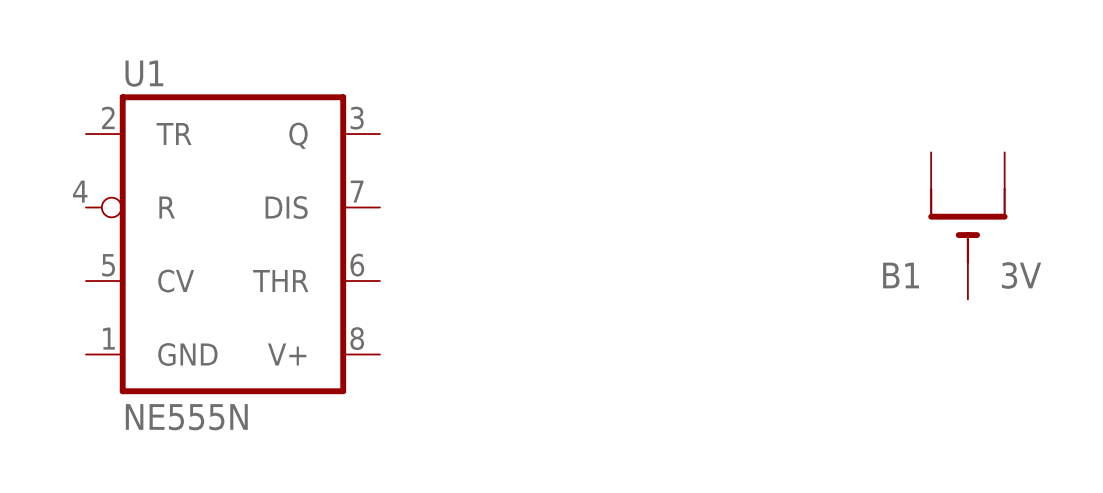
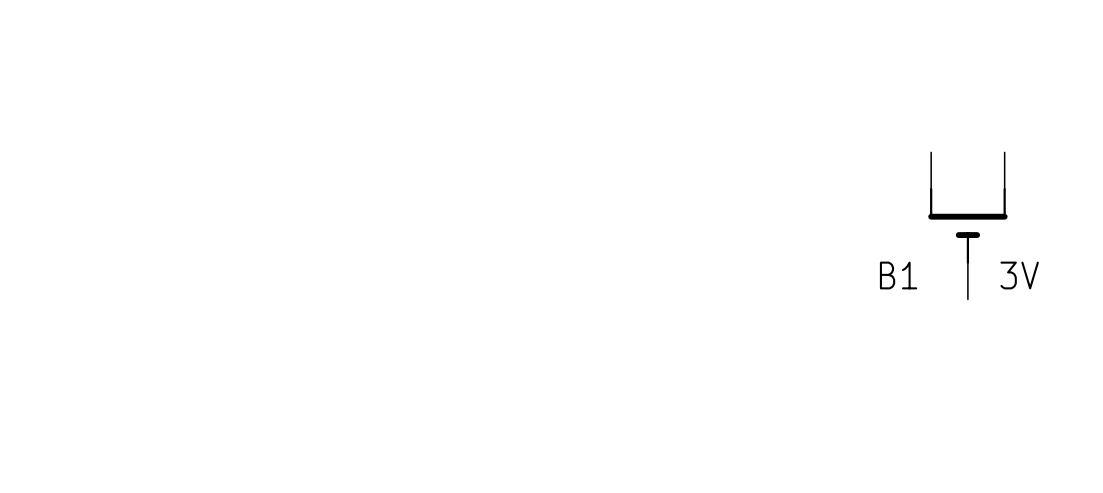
U1: NE555N (232, 244) -> none

